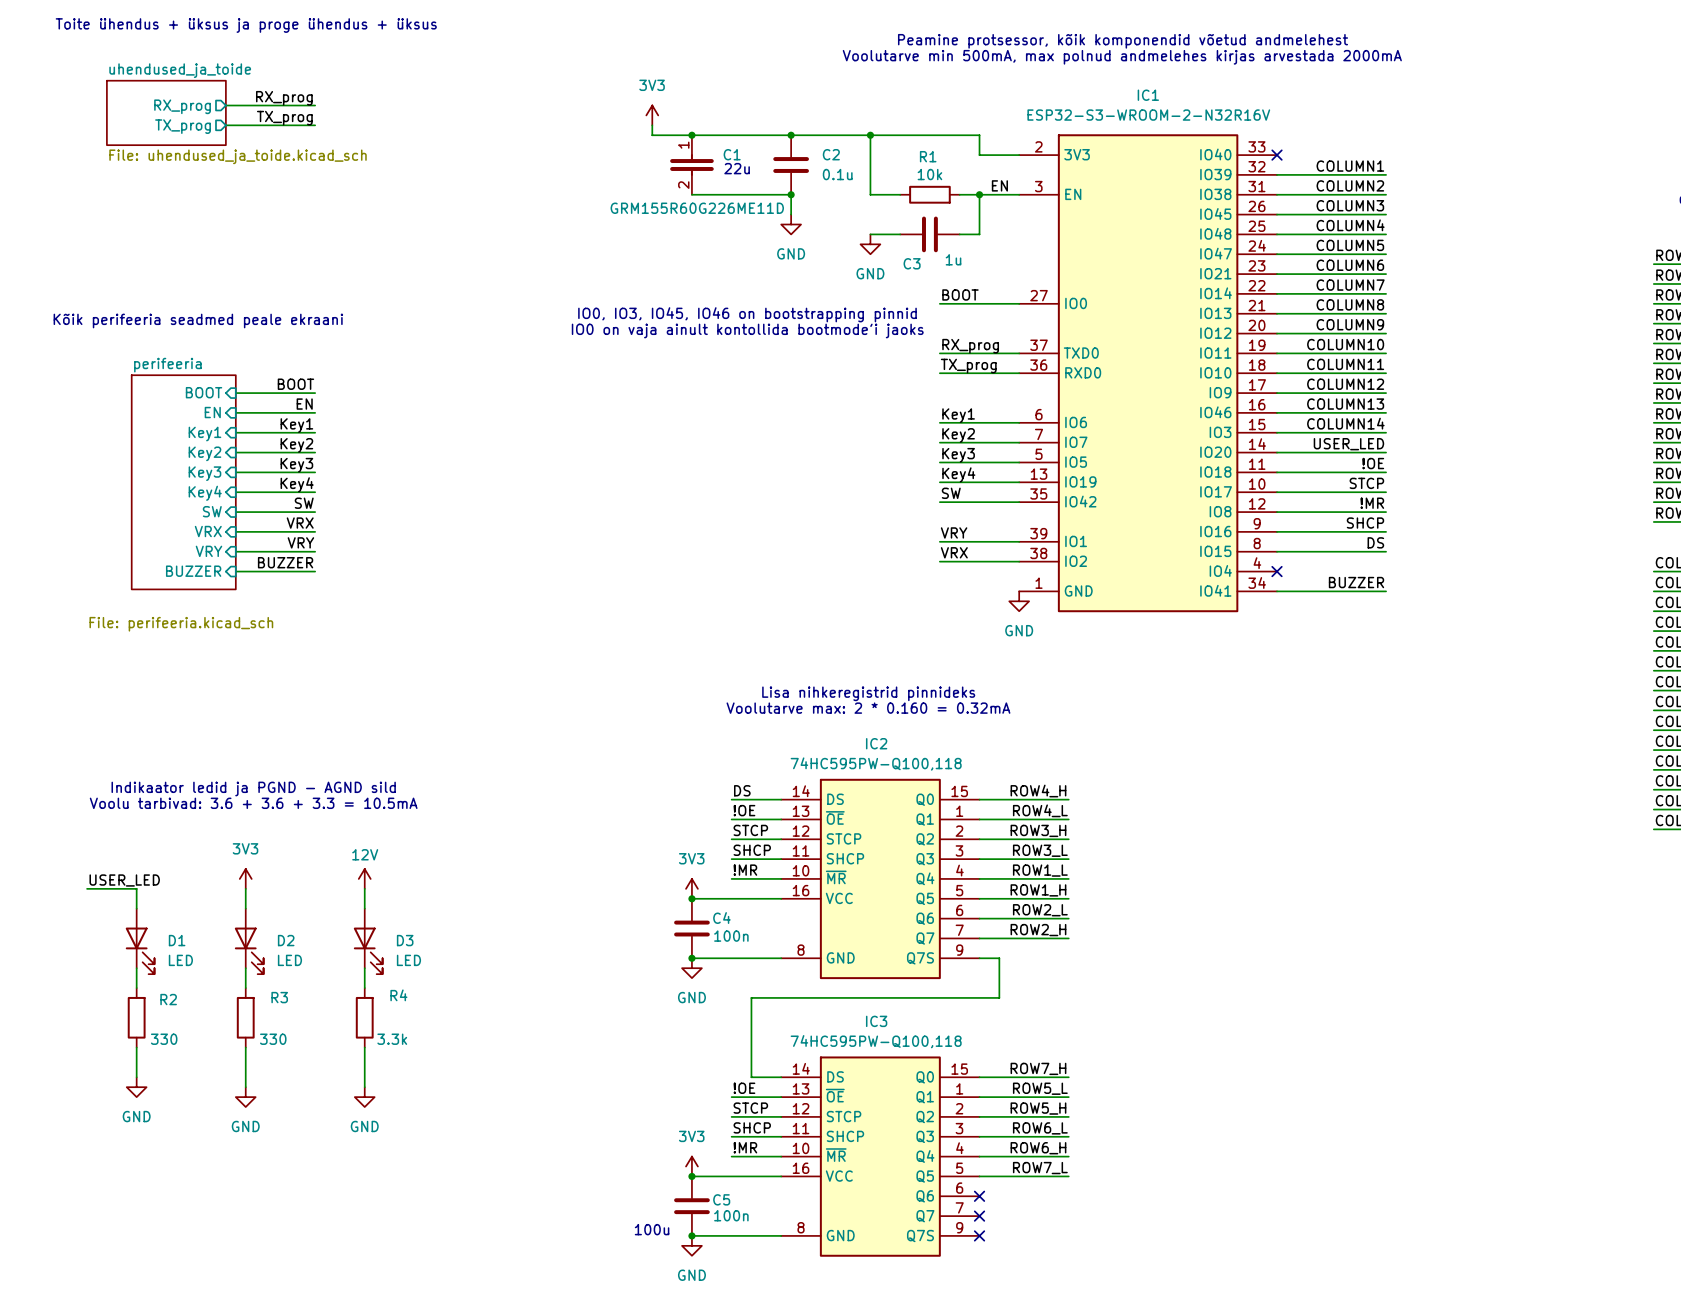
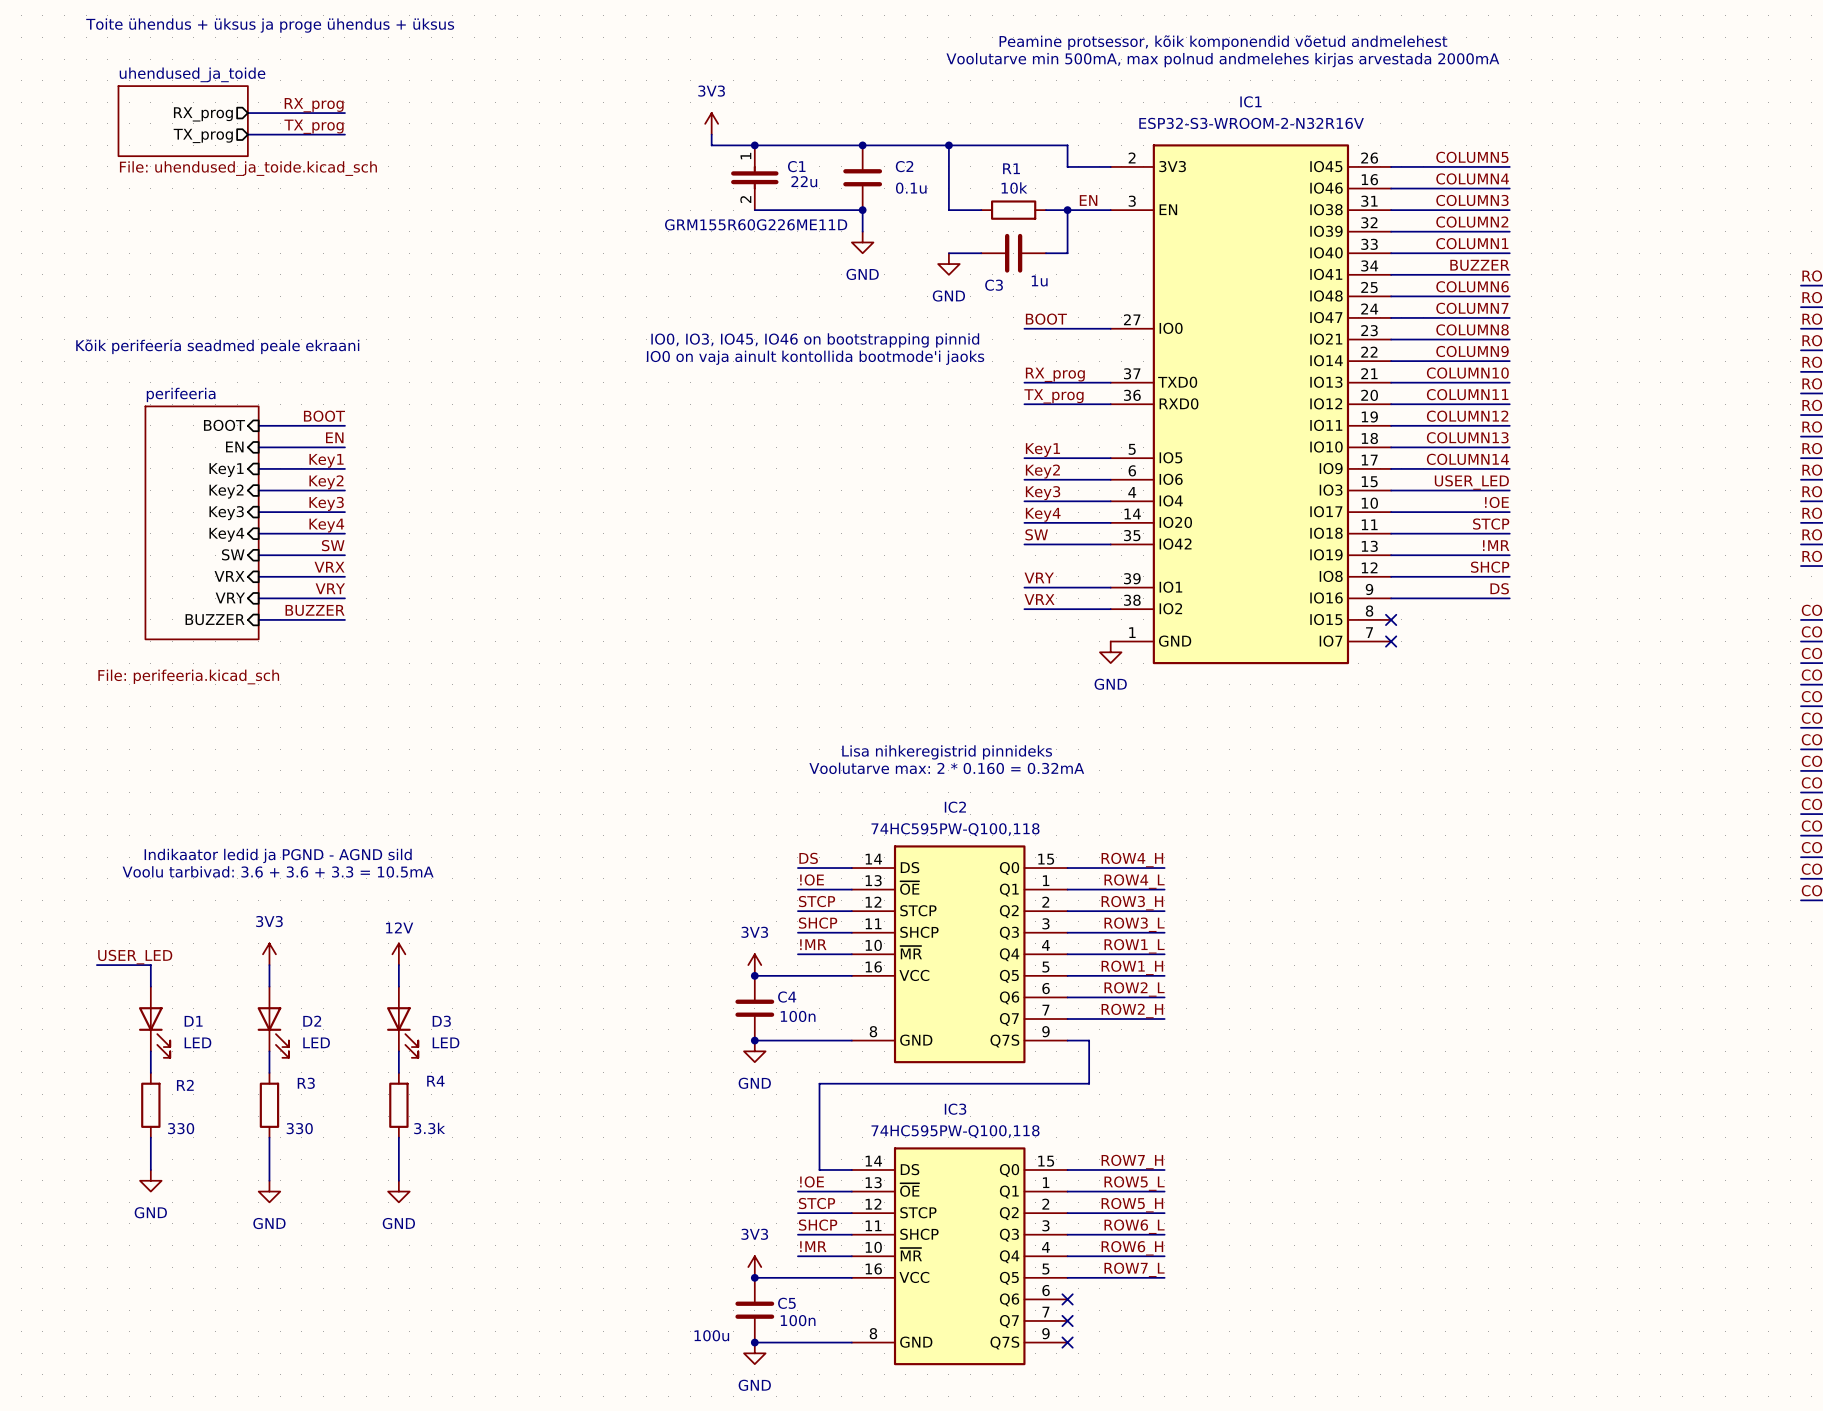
IC1 symbol: [1019, 134, 1278, 613] -> [1110, 144, 1392, 665]
label: none -> COLUMN5 (1472, 157)
wire: none -> (1391, 166) (1509, 166)
no-connect mark: (1277, 155) -> none
label: COLUMN1 (1350, 166) -> COLUMN4 (1472, 178)
label: COLUMN2 (1350, 185) -> COLUMN3 (1472, 200)
label: COLUMN3 (1350, 205) -> COLUMN2 (1472, 222)
label: COLUMN4 (1350, 225) -> COLUMN1 (1472, 243)
label: COLUMN5 (1350, 245) -> BUZZER (1479, 265)
label: BUZZER (1356, 582) -> none
wire: (1277, 591) (1386, 591) -> none
no-connect mark: none -> (1391, 641)

